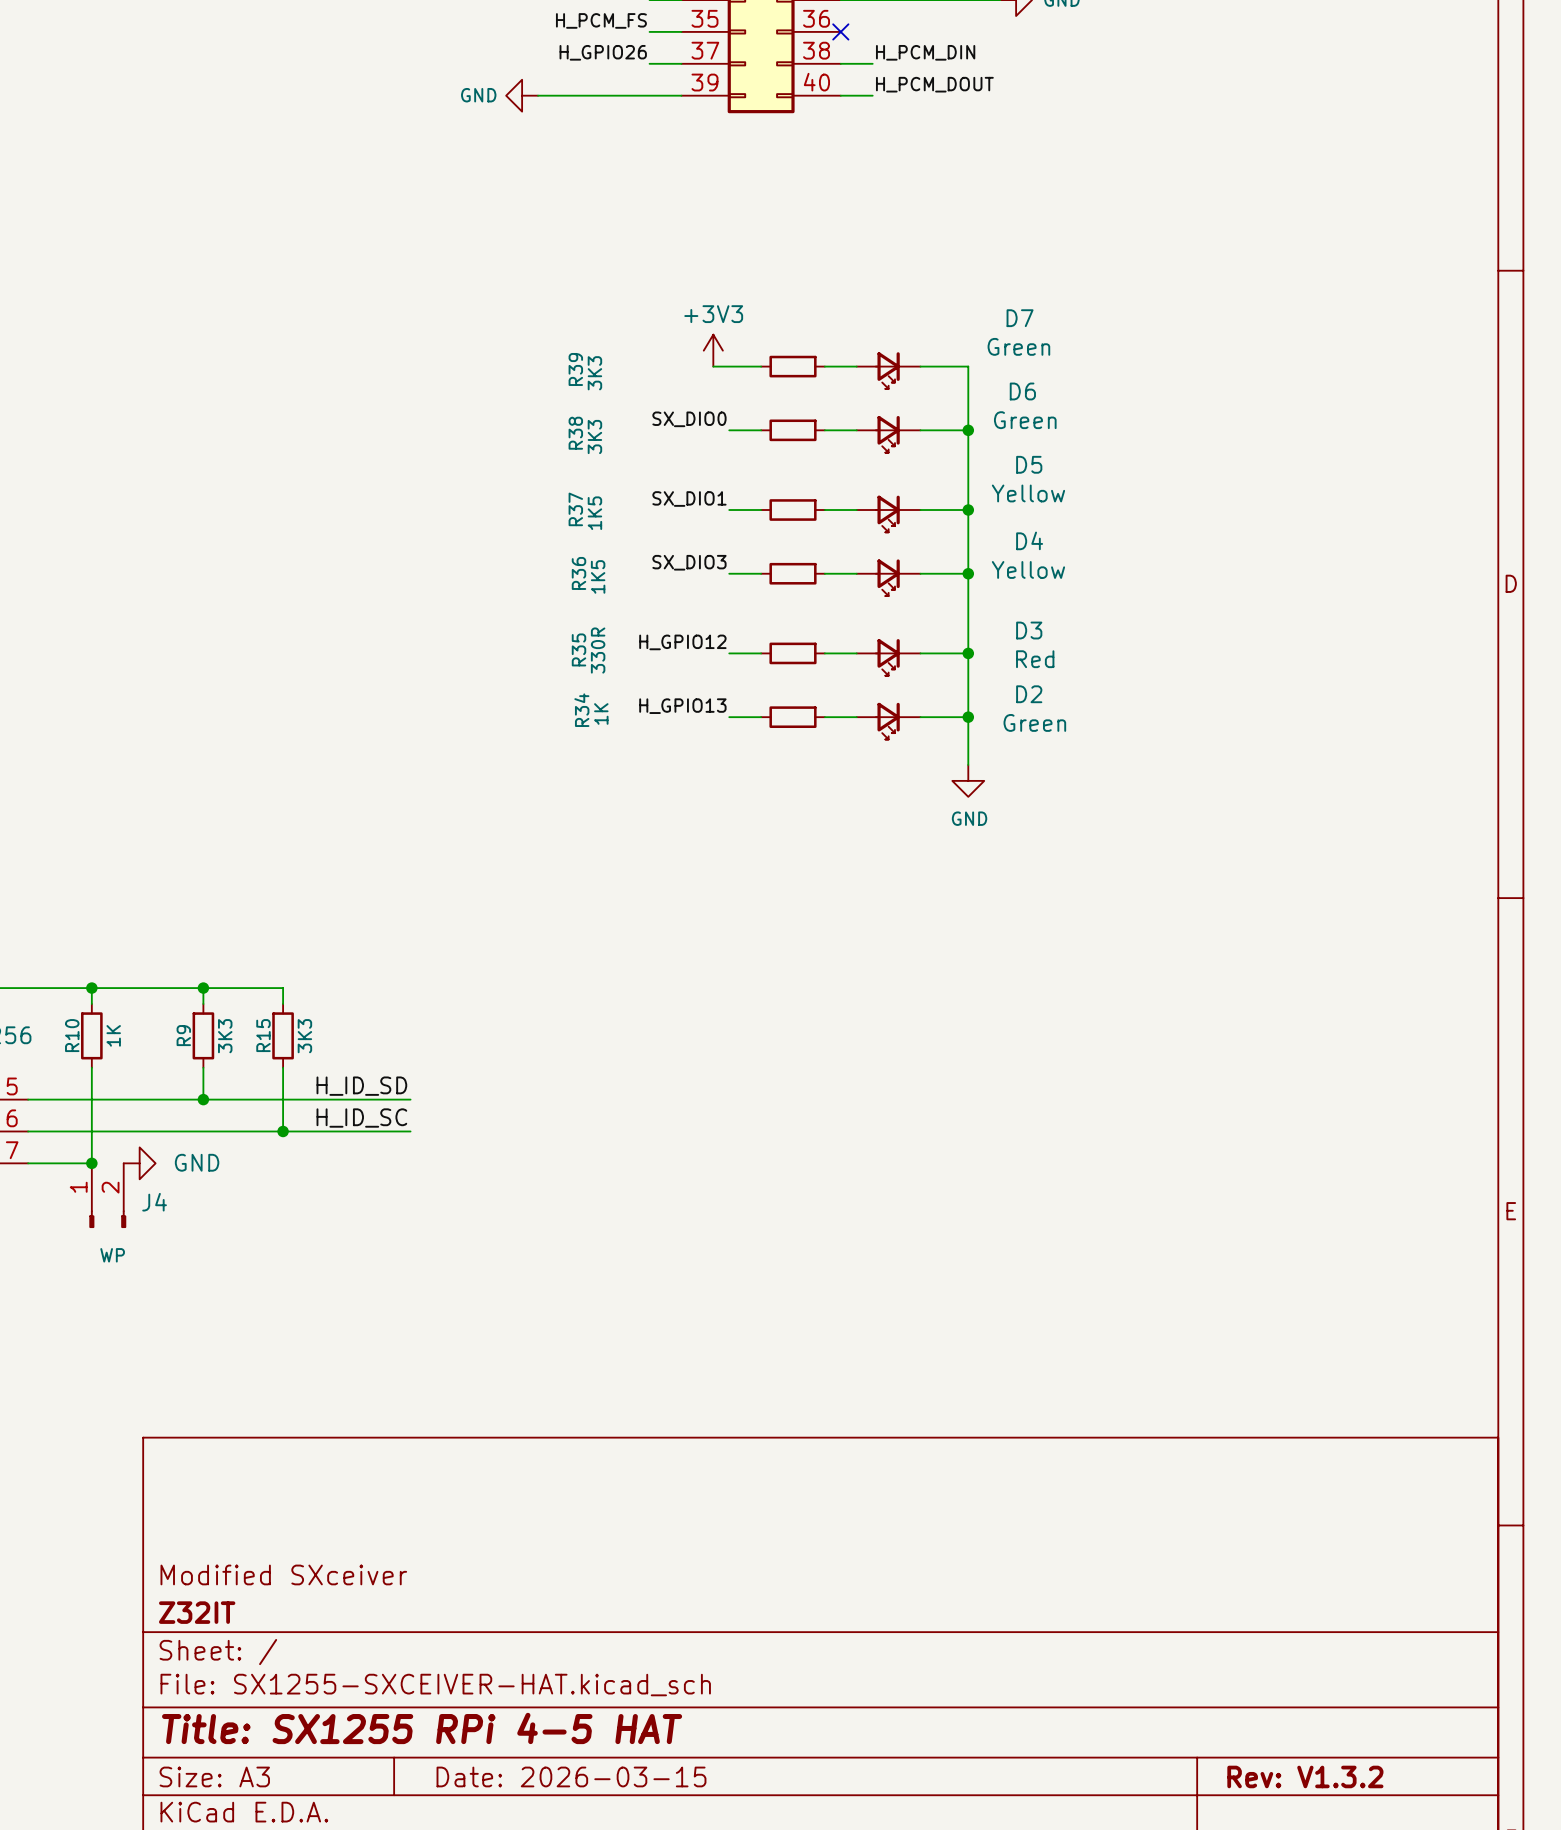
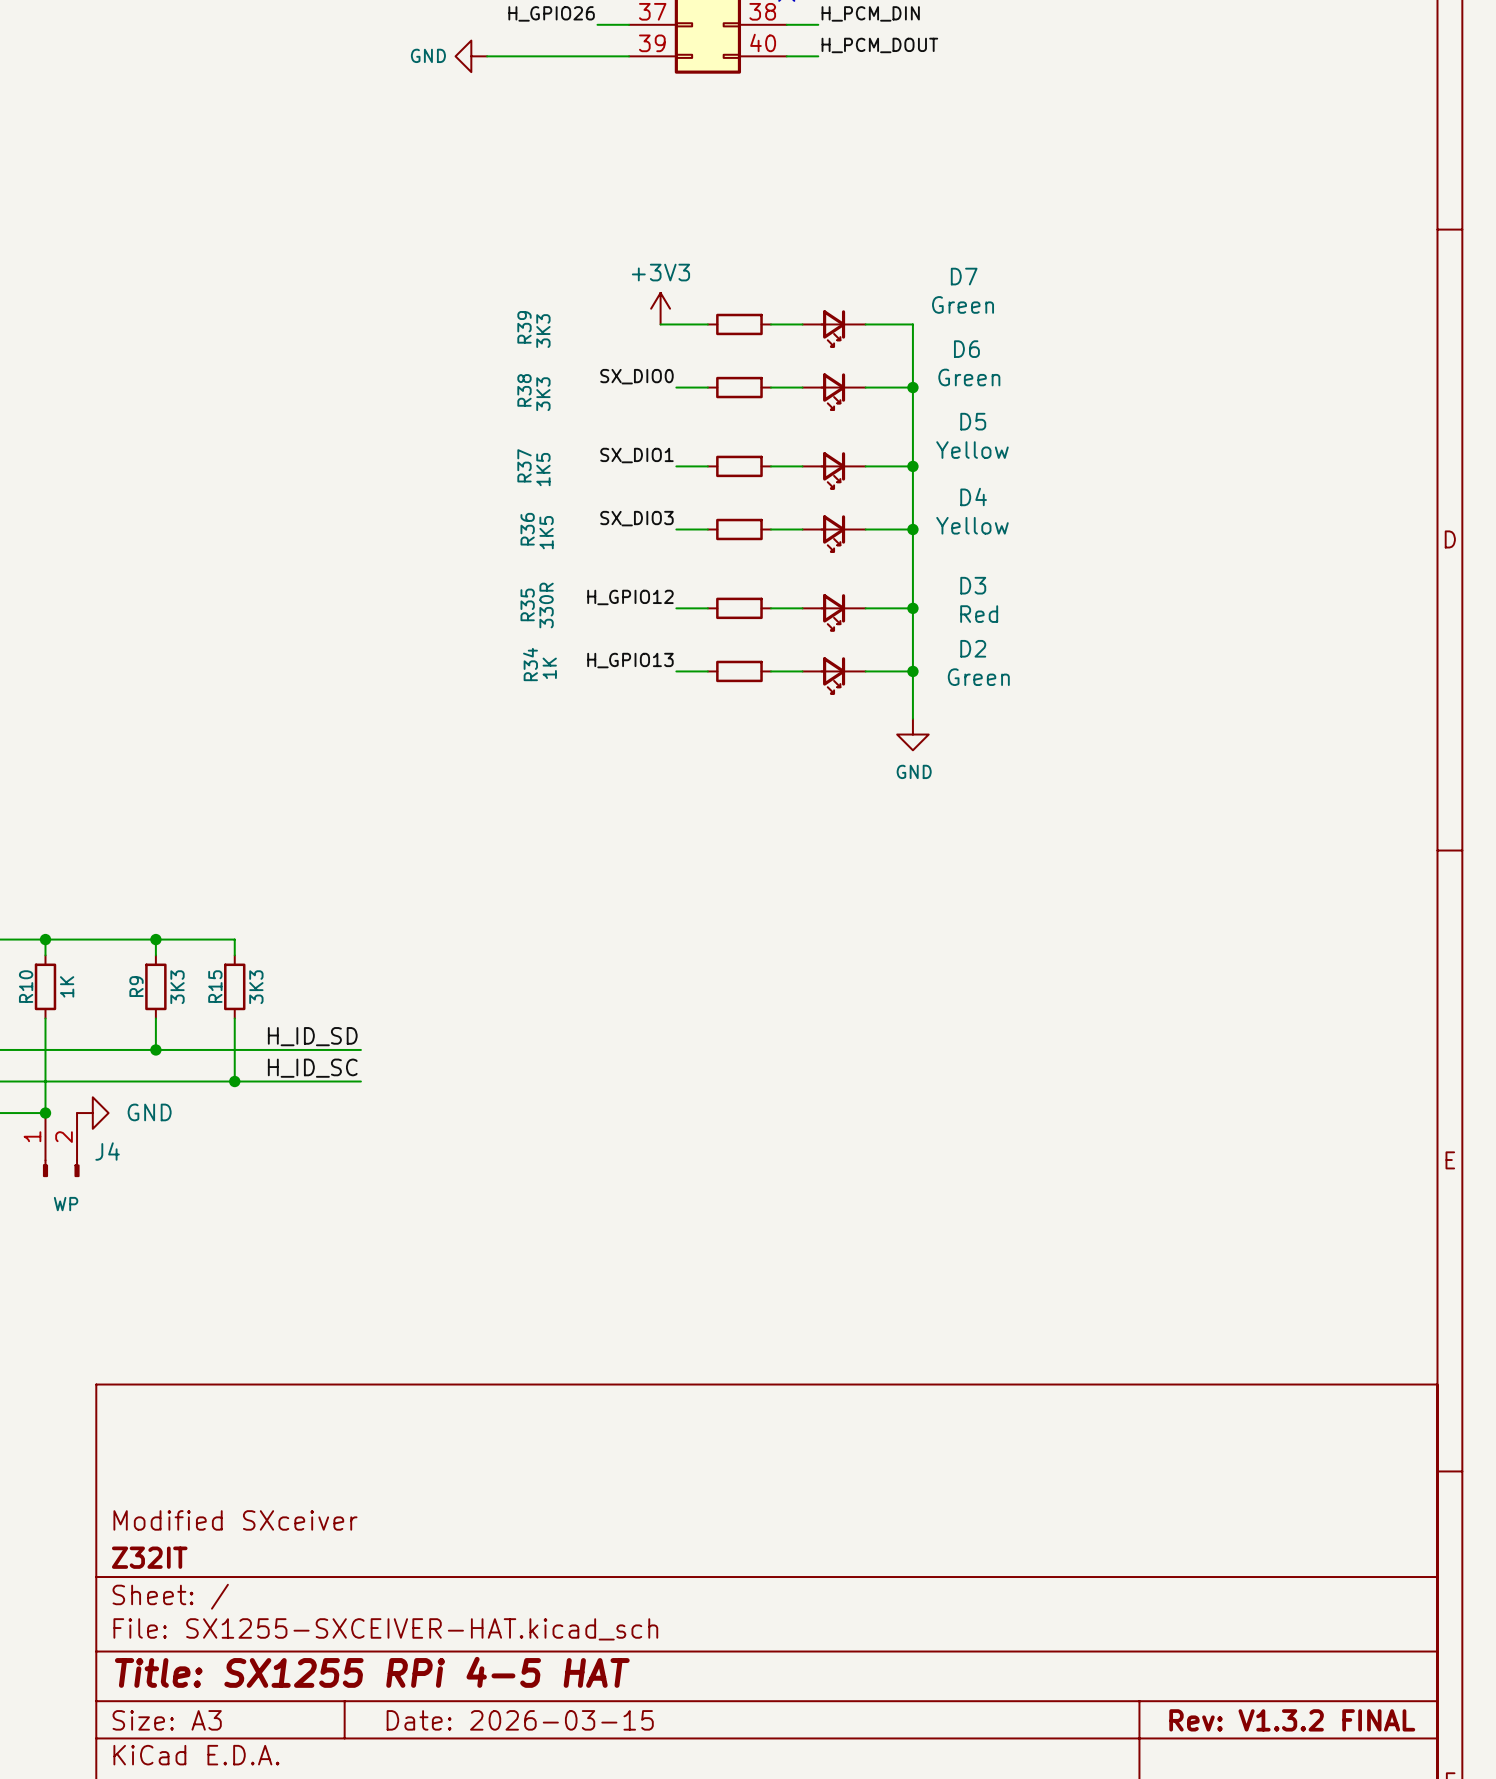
title block: Rev: V1.3.2 (1305, 1776) -> Rev: V1.3.2 FINAL (1292, 1720)

